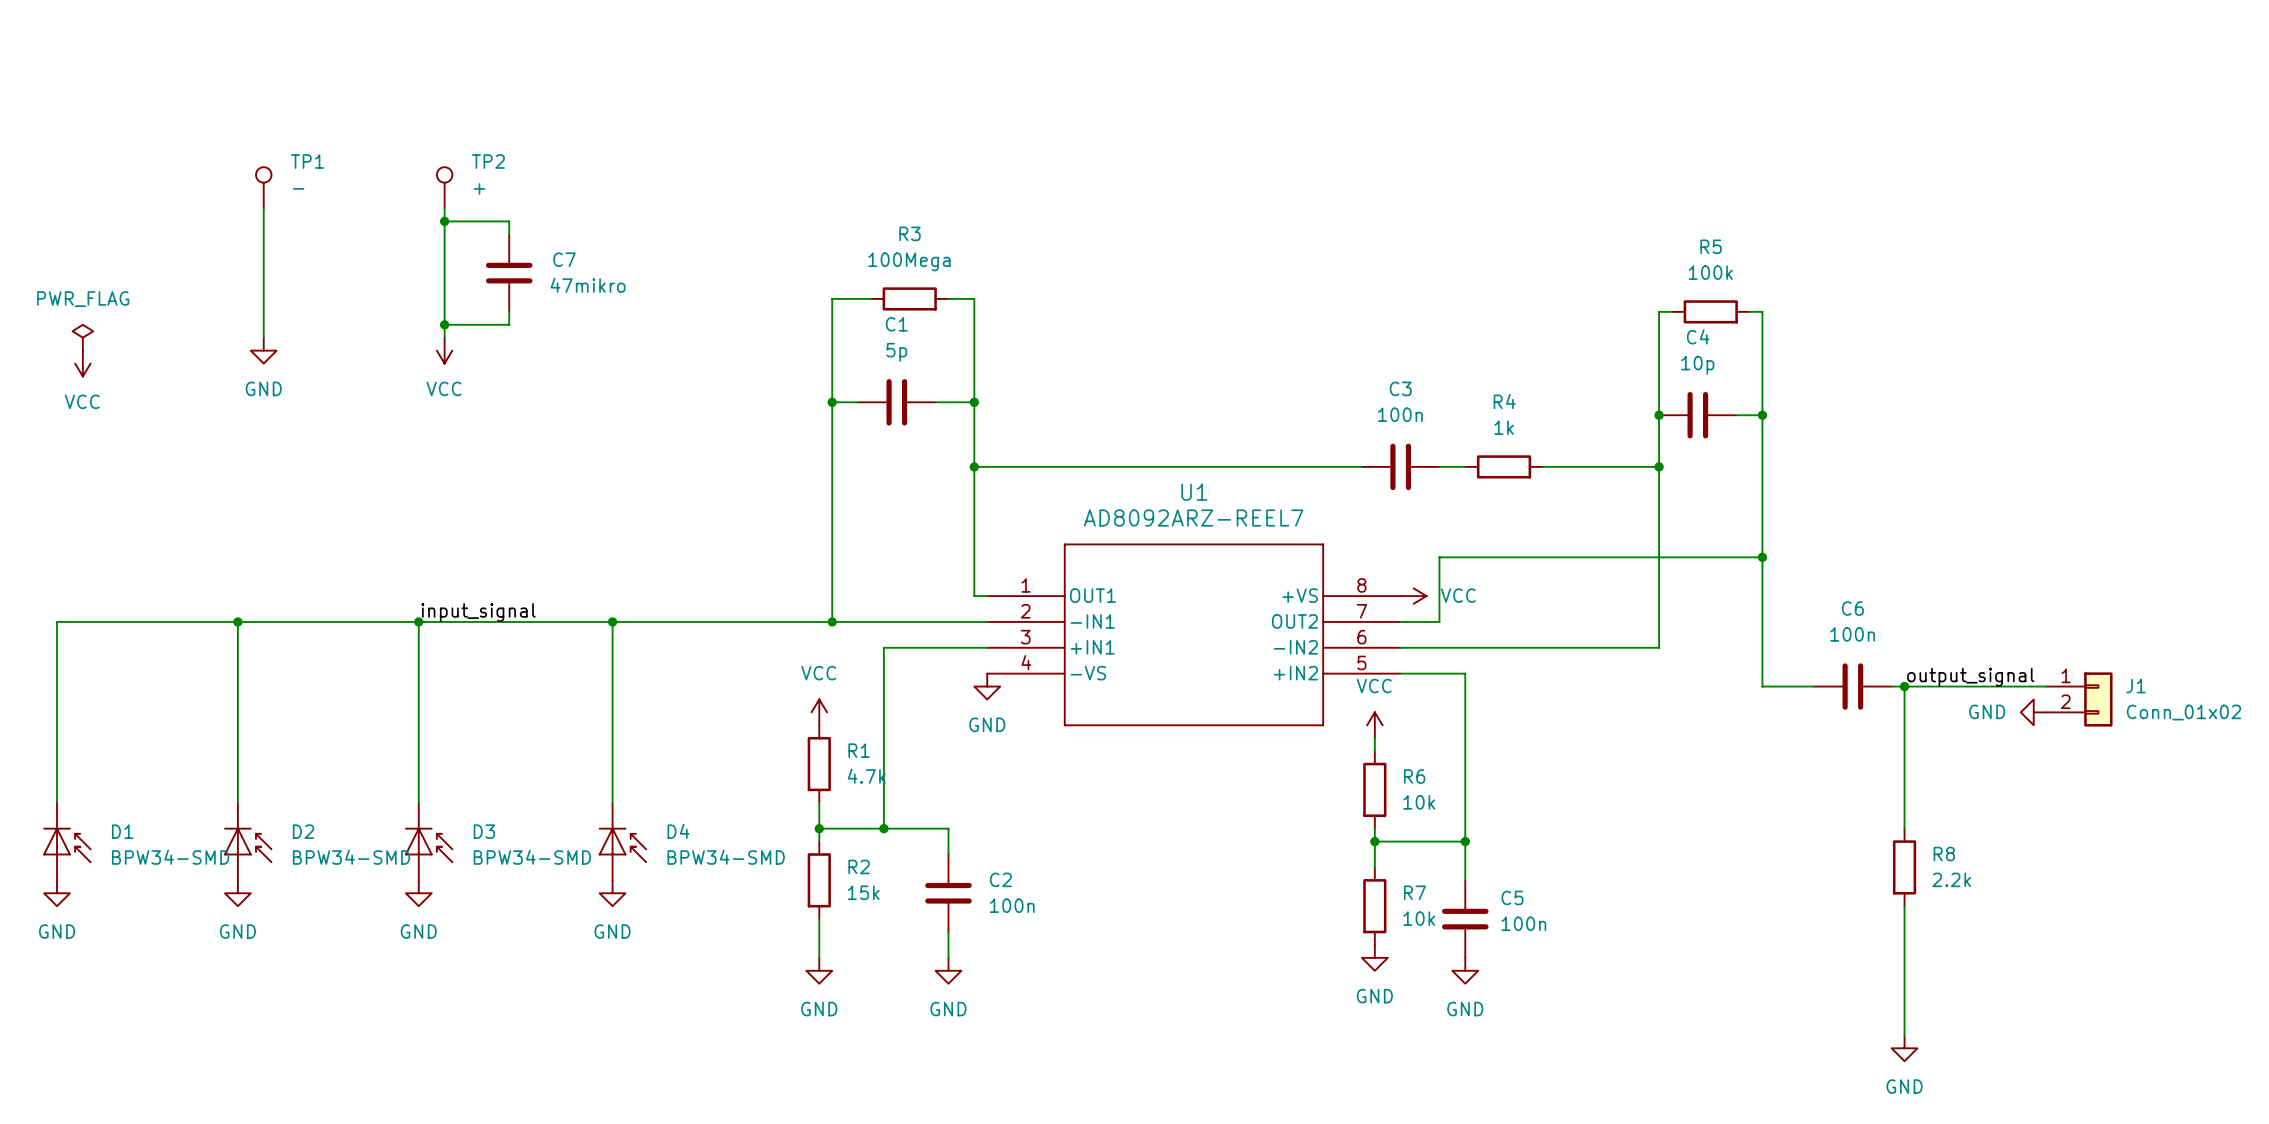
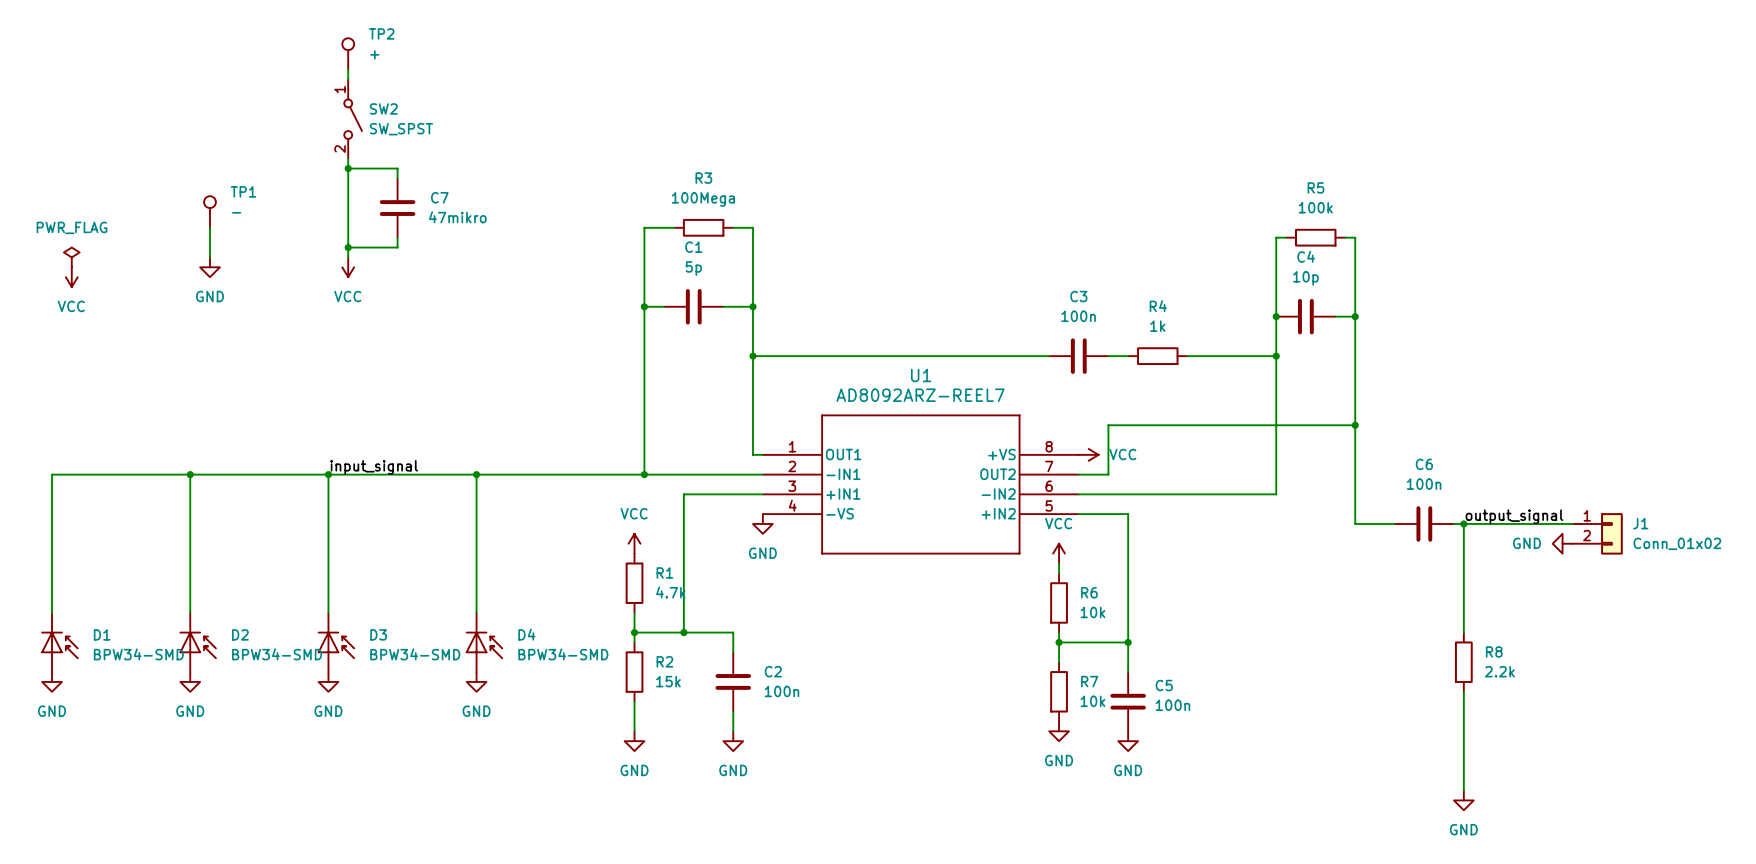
wire: none -> (348, 69) (348, 79)
SW2: none -> SW_SPST (353, 119)
TP1 position: (263, 187) -> (209, 212)
TP2 position: (444, 187) -> (348, 54)
wire: (263, 208) (263, 298) -> none

